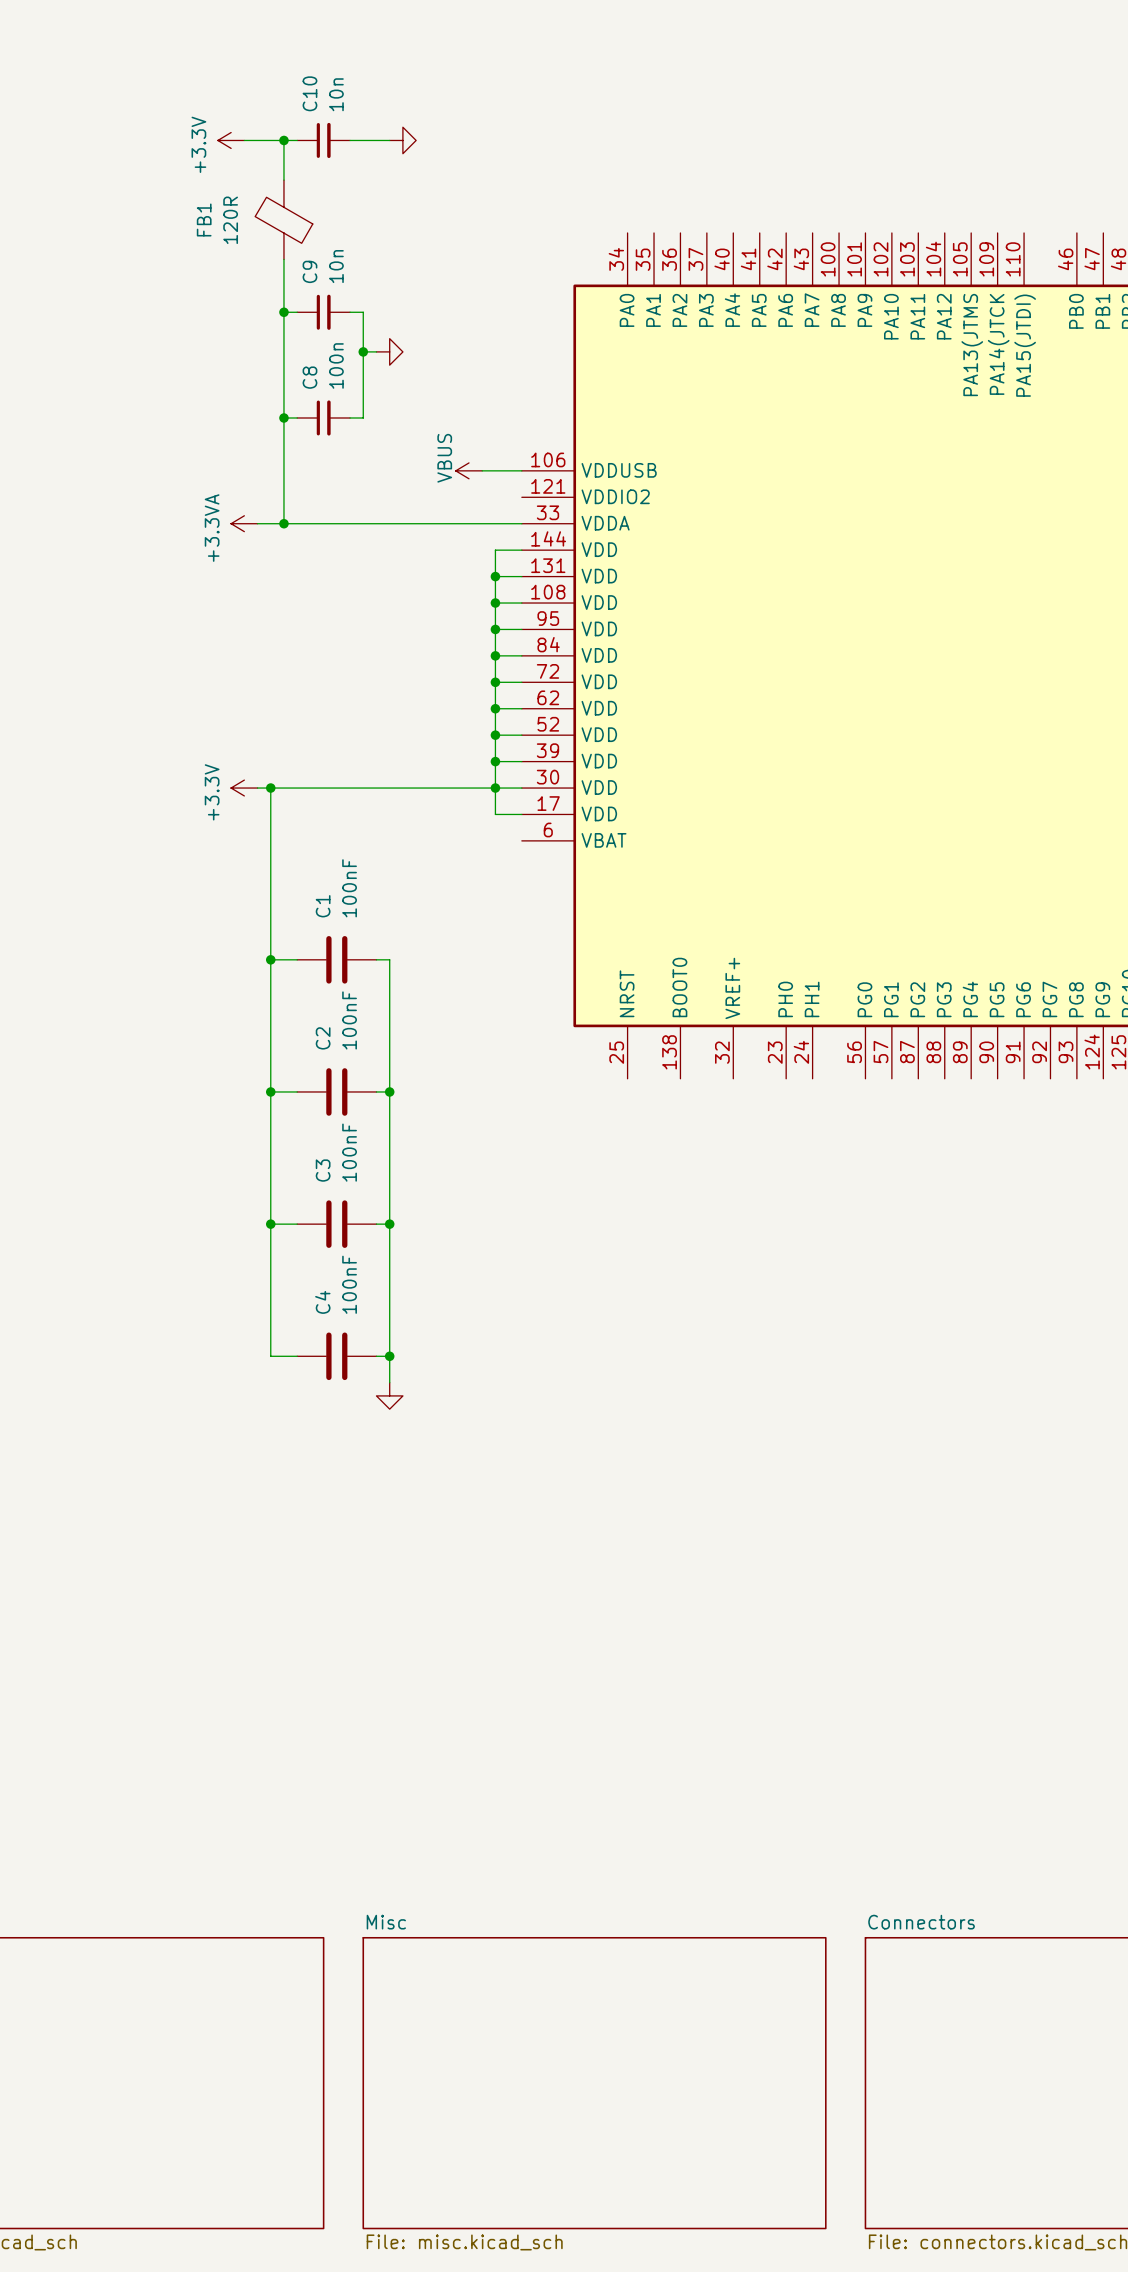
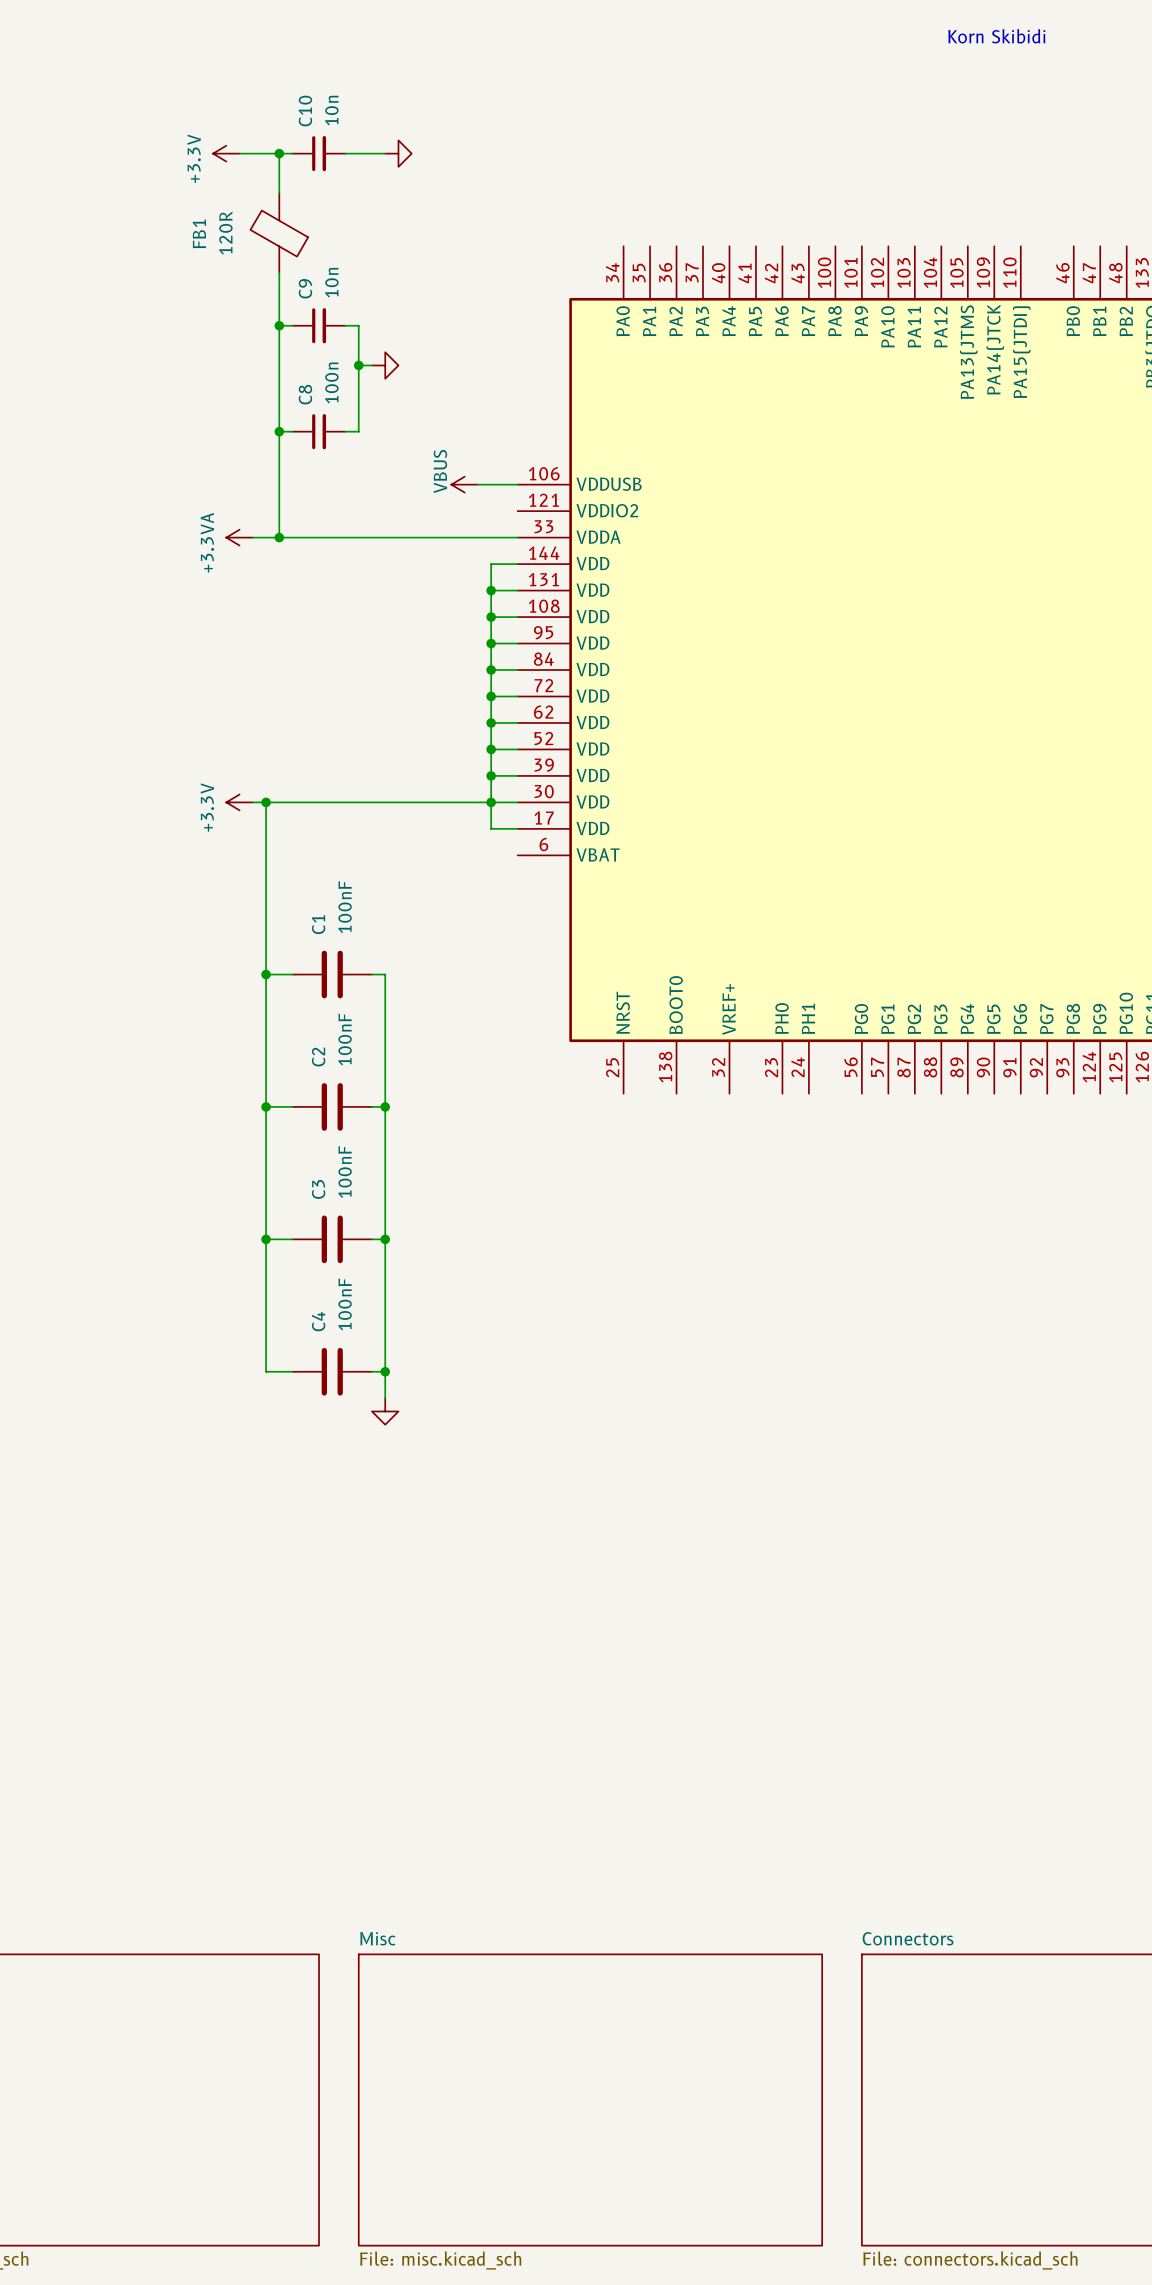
text: none -> Korn Skibidi (996, 36)

